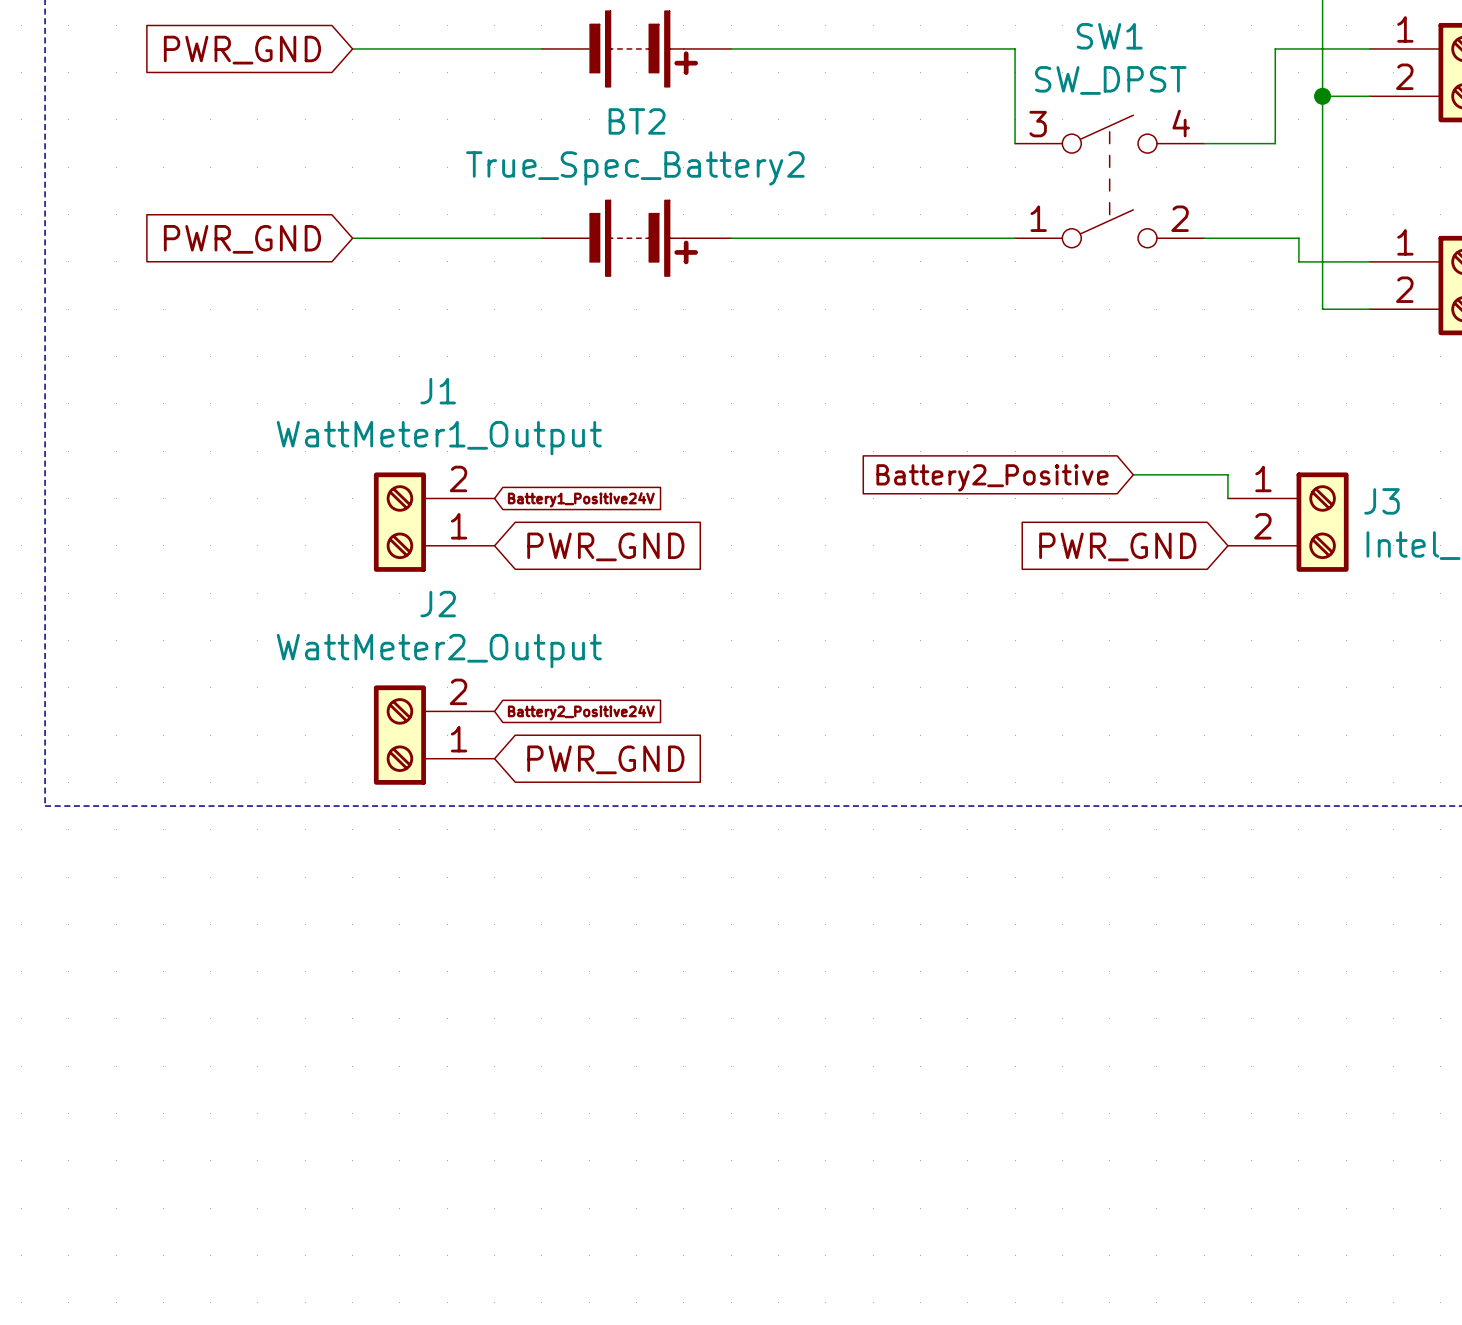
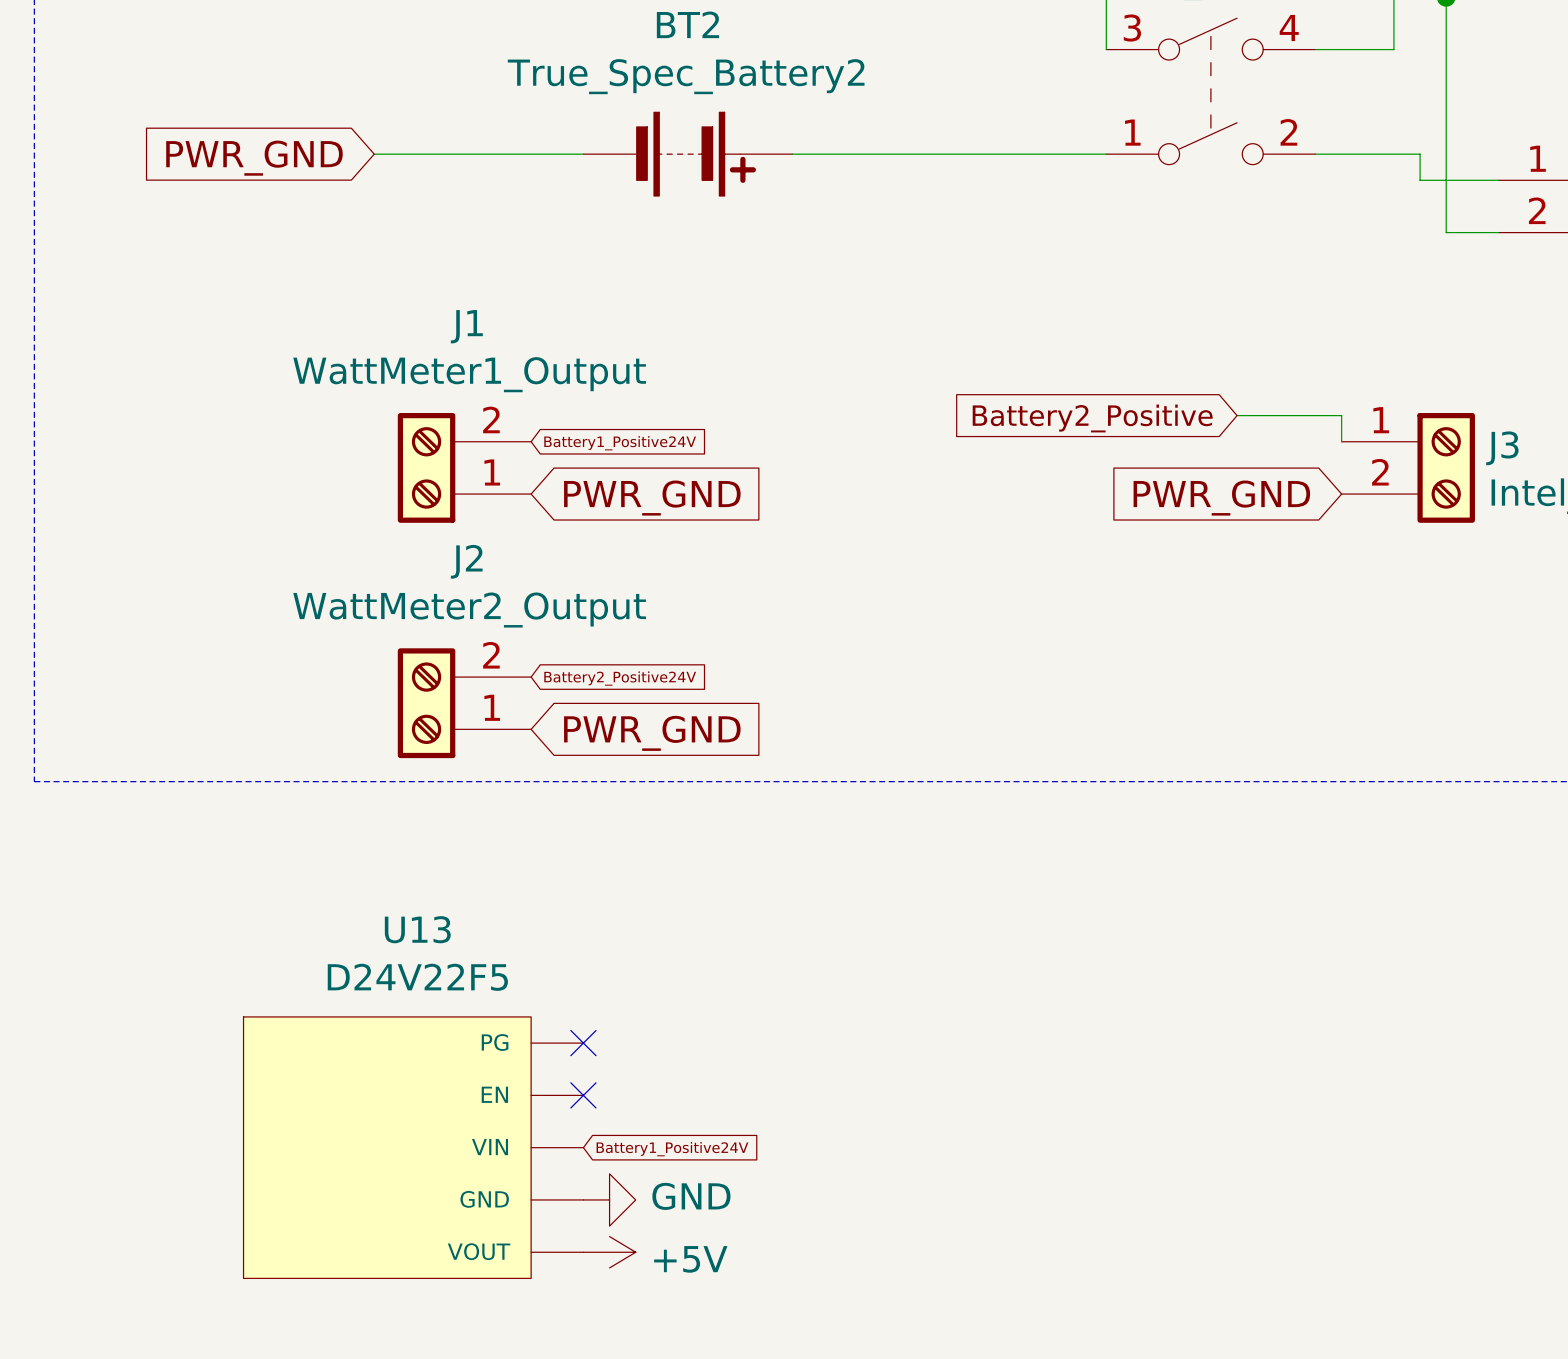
no-connect mark: none -> (583, 1043)
no-connect mark: none -> (583, 1095)
U13: none -> D24V22F5 (413, 1147)
global label: none -> Battery1_Positive24V (672, 1149)
power symbol: none -> GND (609, 1199)
power symbol: none -> +5V (609, 1252)

